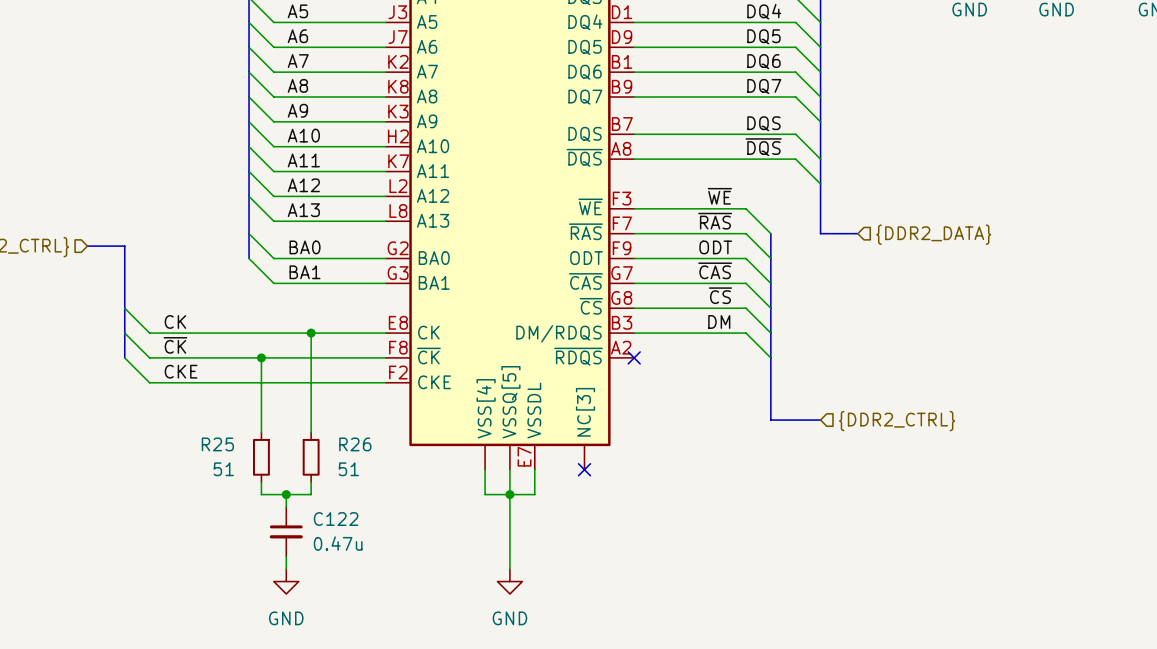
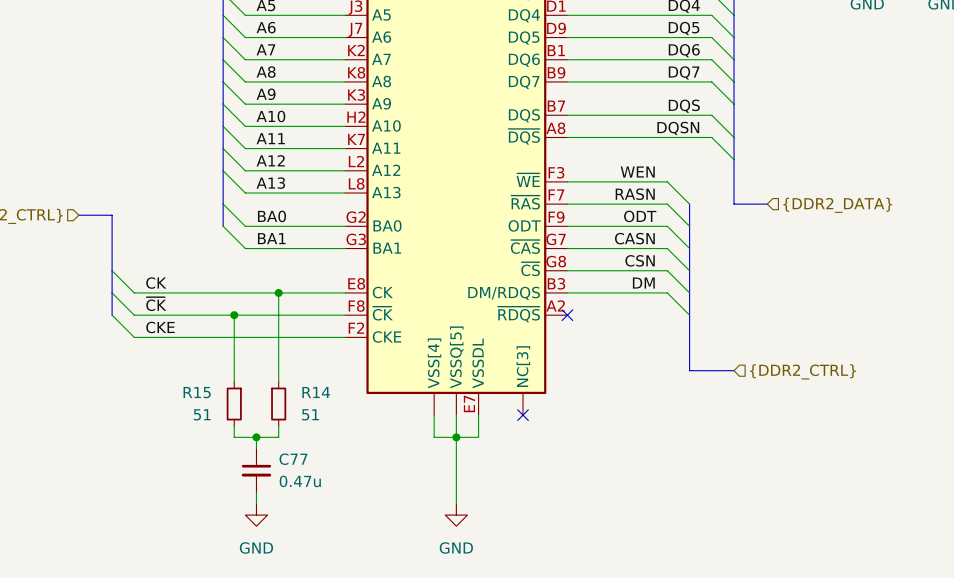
label: ~{DQS} (763, 147) -> DQSN (678, 128)
label: ~{WE} (719, 196) -> WEN (637, 171)
label: ~{RAS} (715, 221) -> RASN (635, 194)
label: ~{CAS} (715, 270) -> CASN (634, 238)
label: ~{CS} (720, 295) -> CSN (640, 260)
R25 name: R25 (217, 444) -> R15 (197, 392)
R26 name: R26 (355, 444) -> R14 (316, 392)
C122 name: C122 (336, 519) -> C77 (293, 459)

